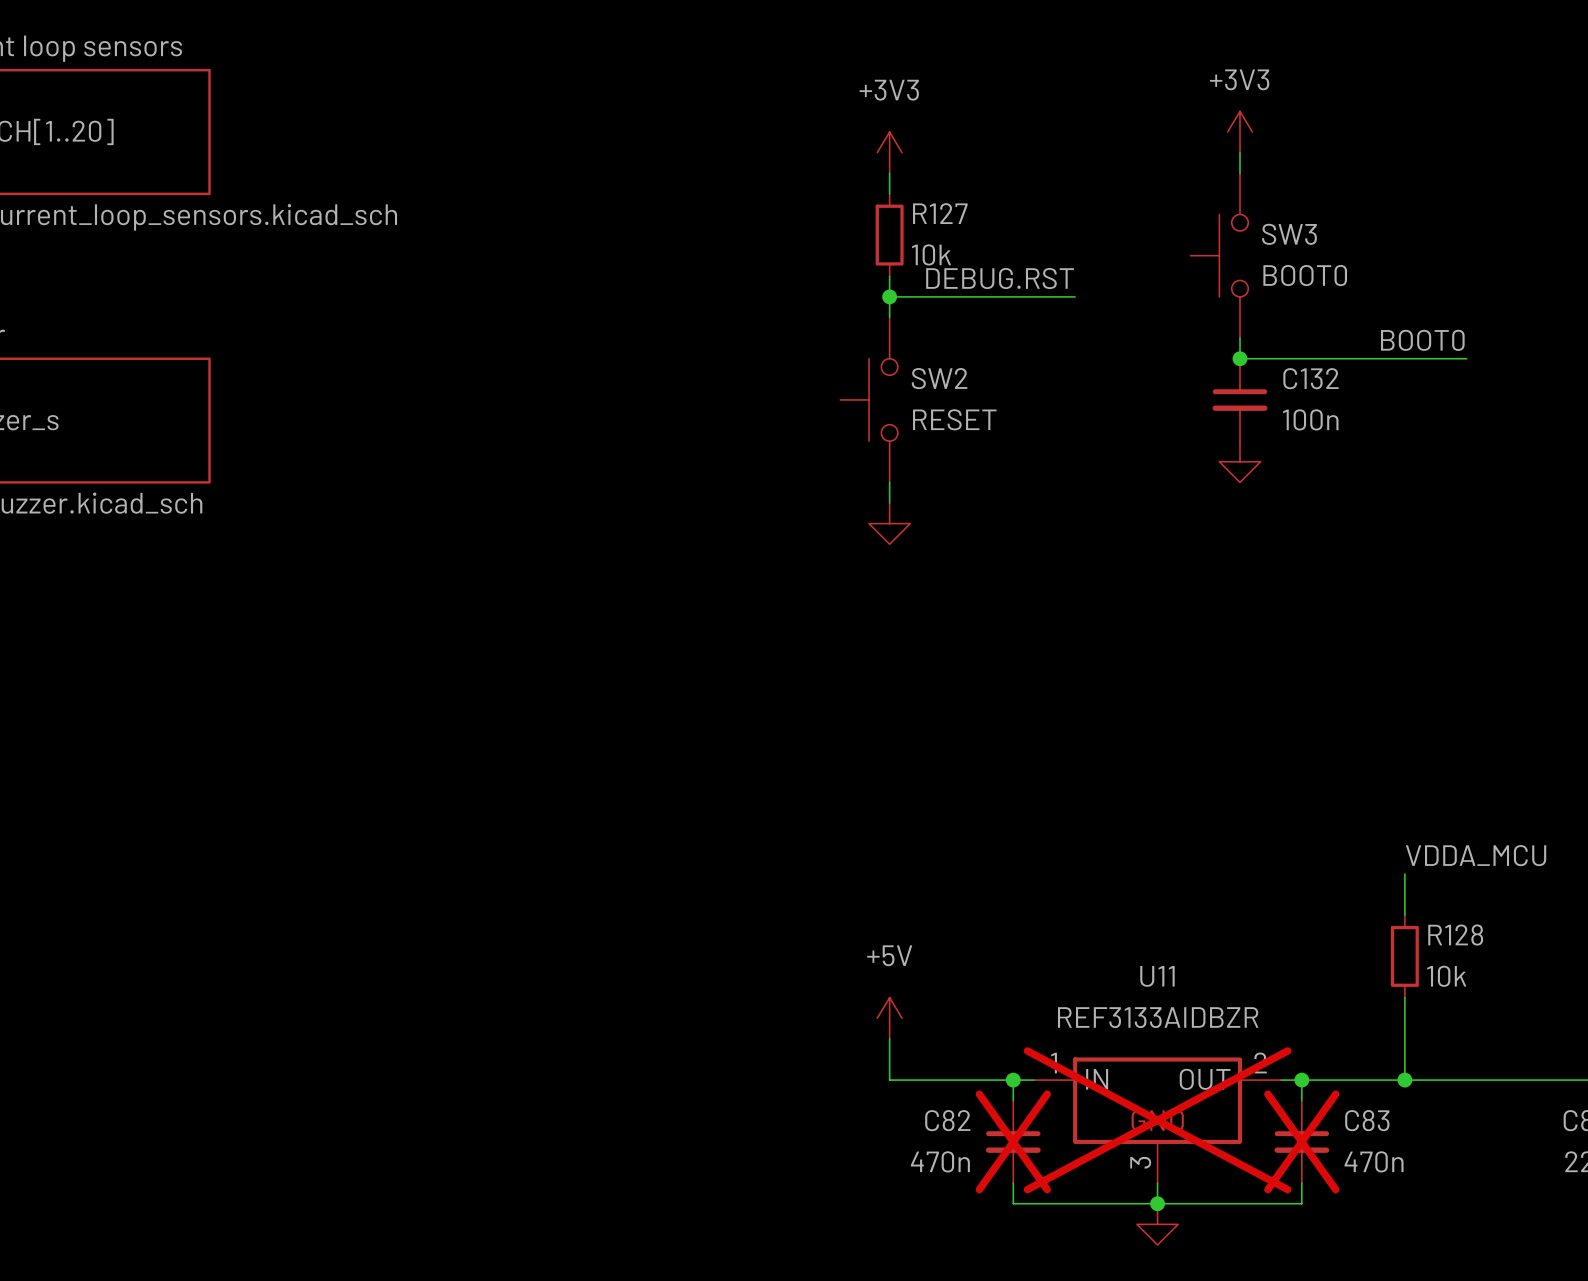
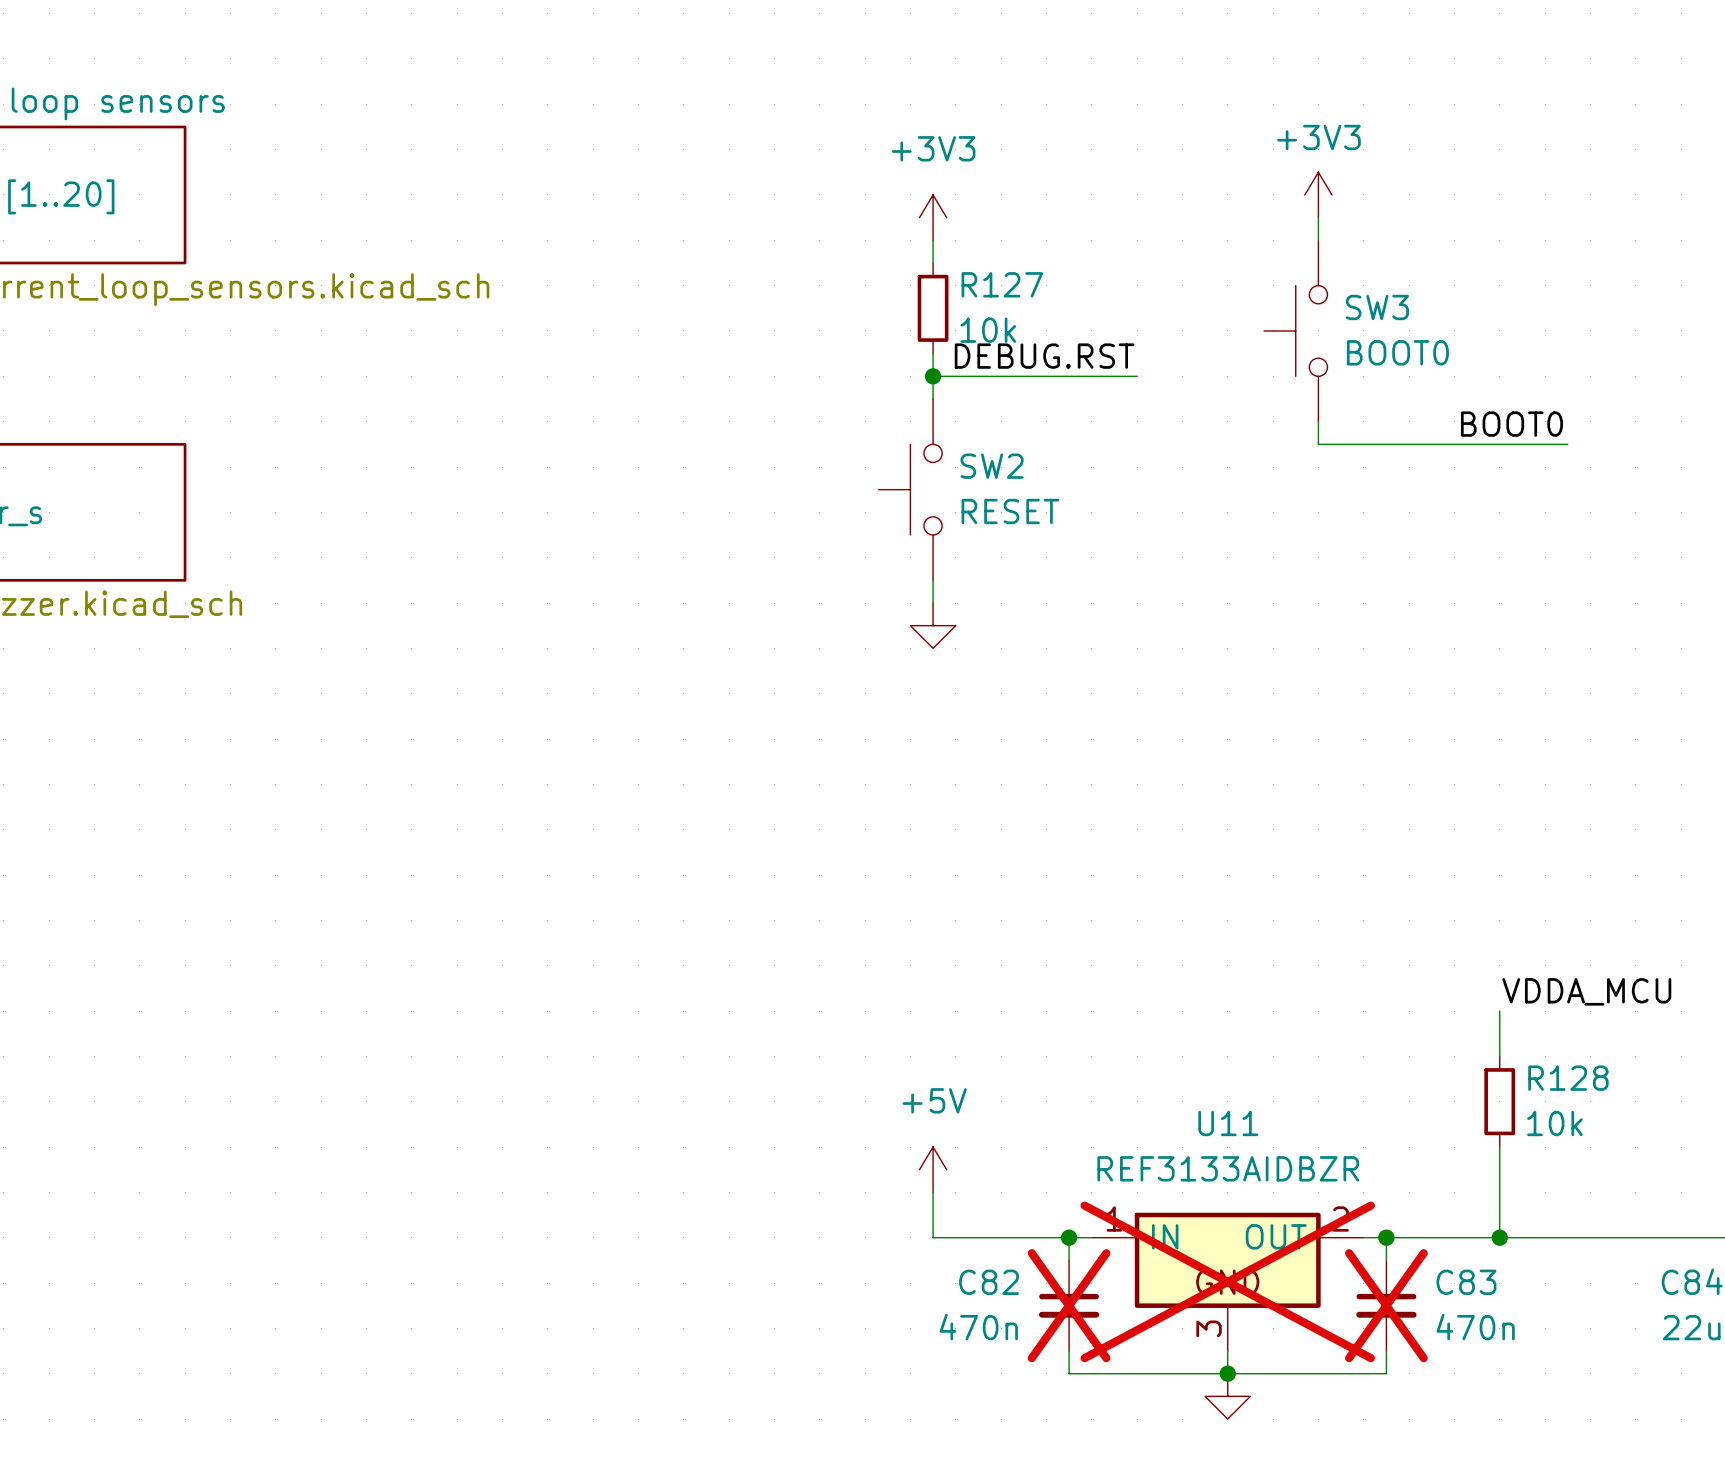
junction: (1240, 358) -> none
C132: 100n (1240, 399) -> none
power symbol: (1240, 461) -> none

